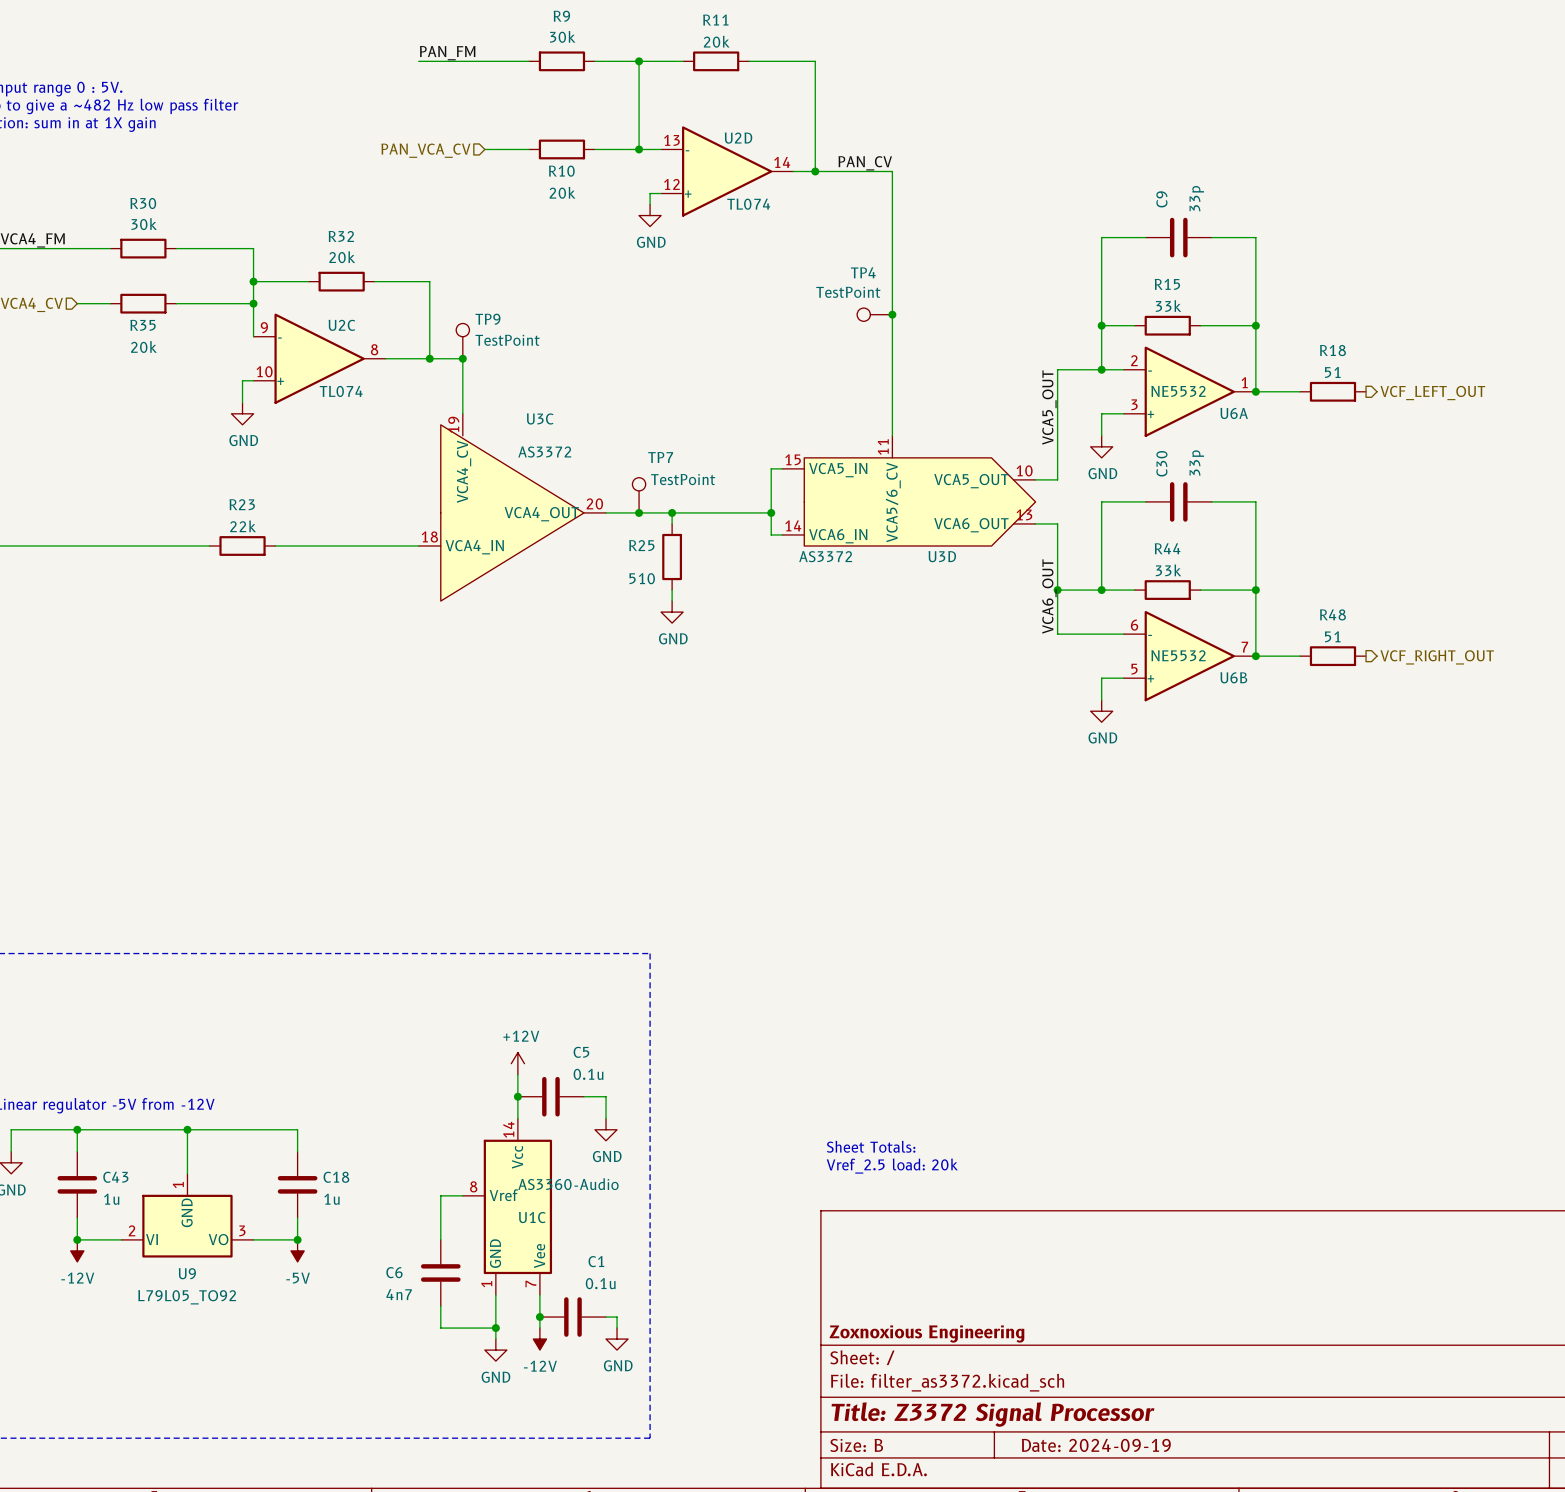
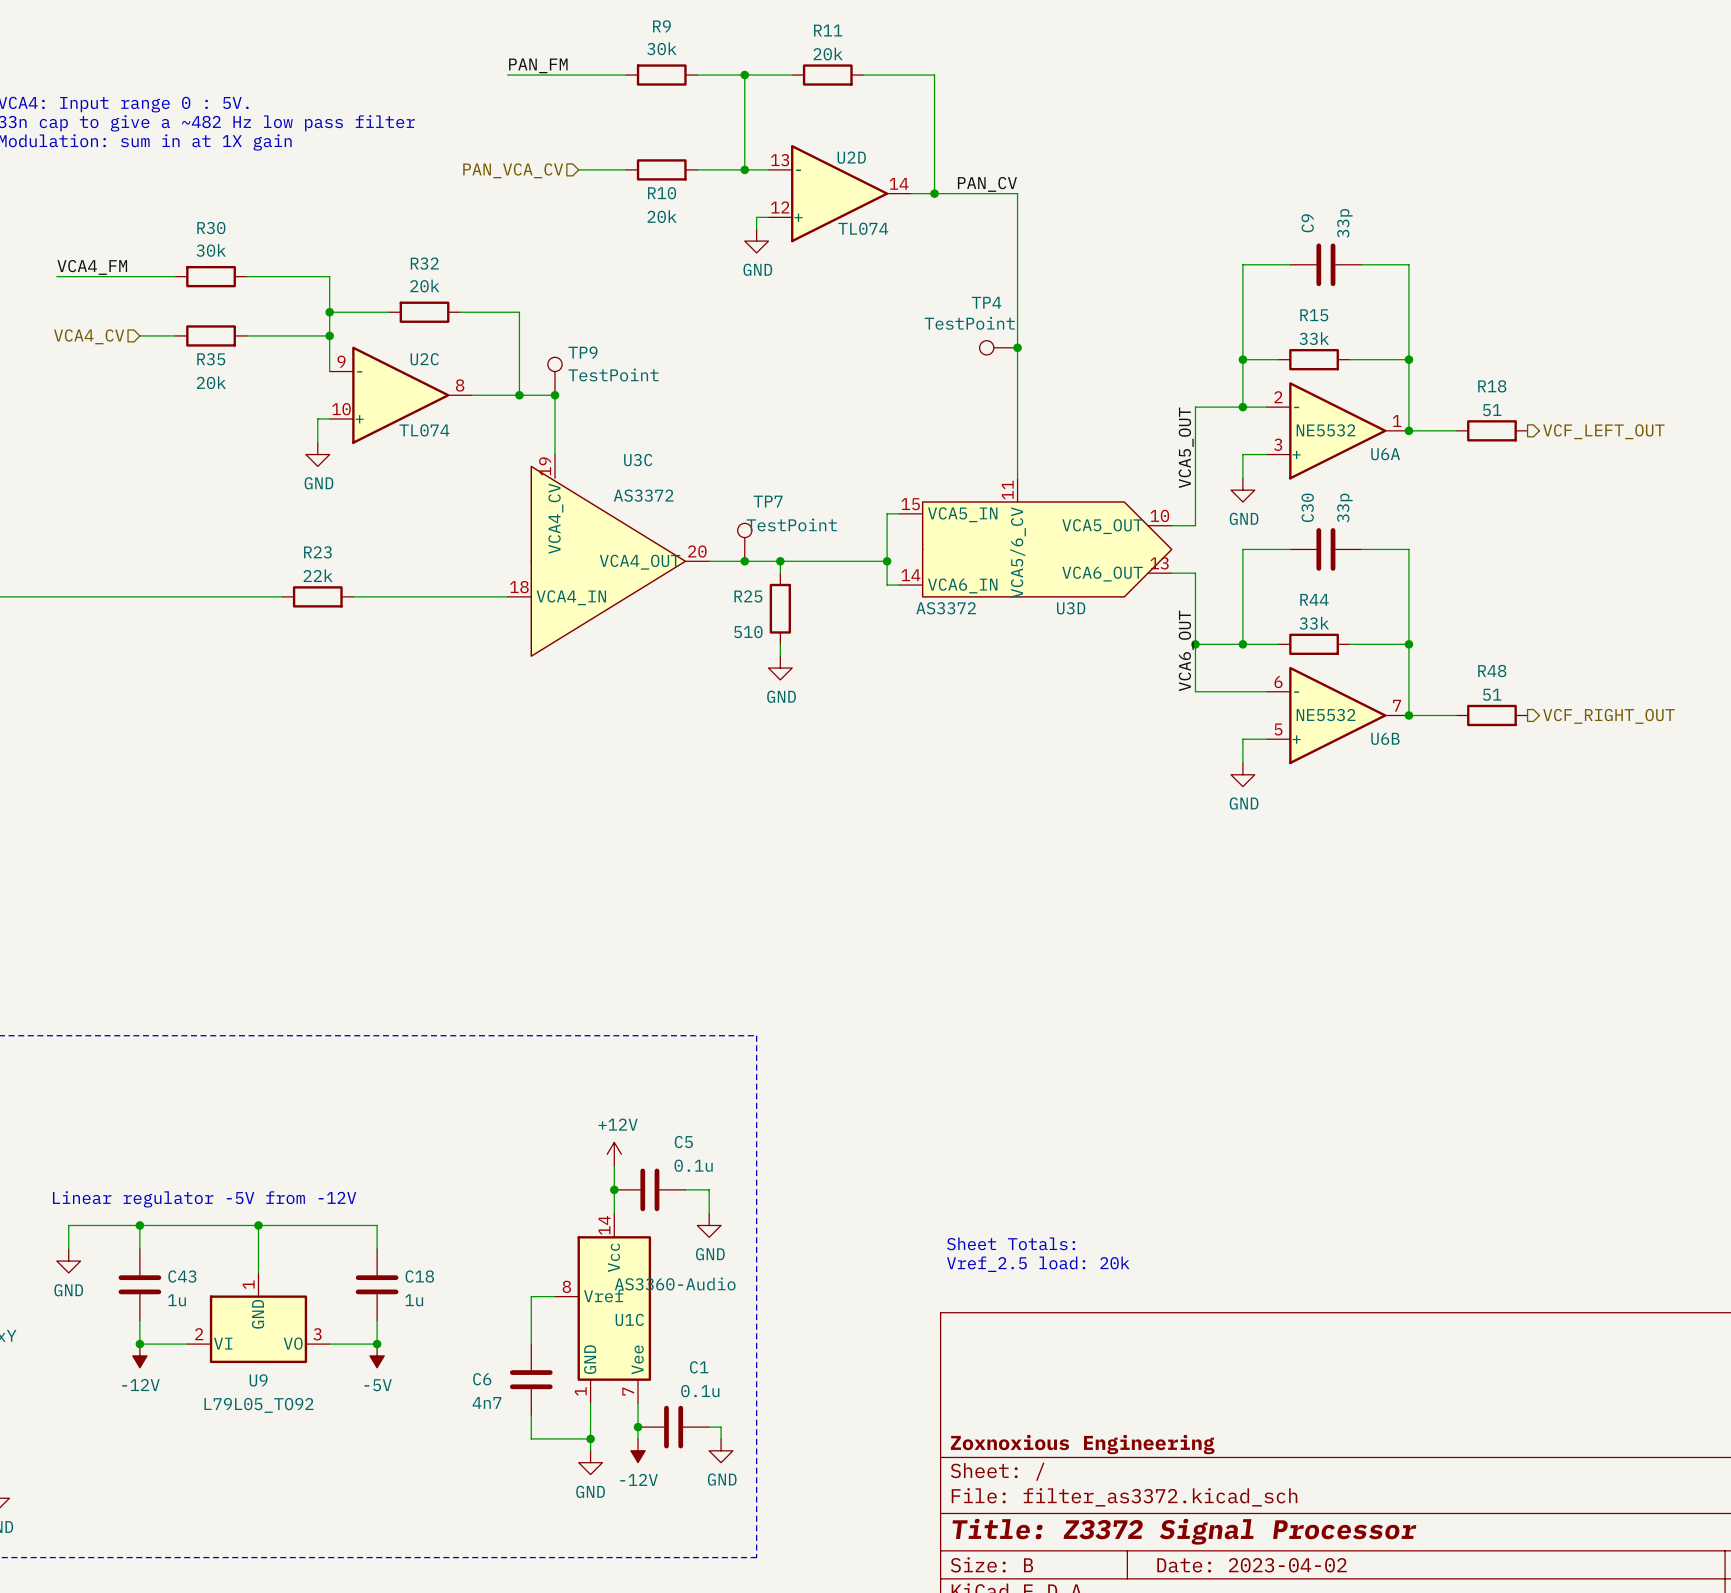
title block: Date: 2024-09-19 (1096, 1445) -> Date: 2023-04-02 (1252, 1565)

